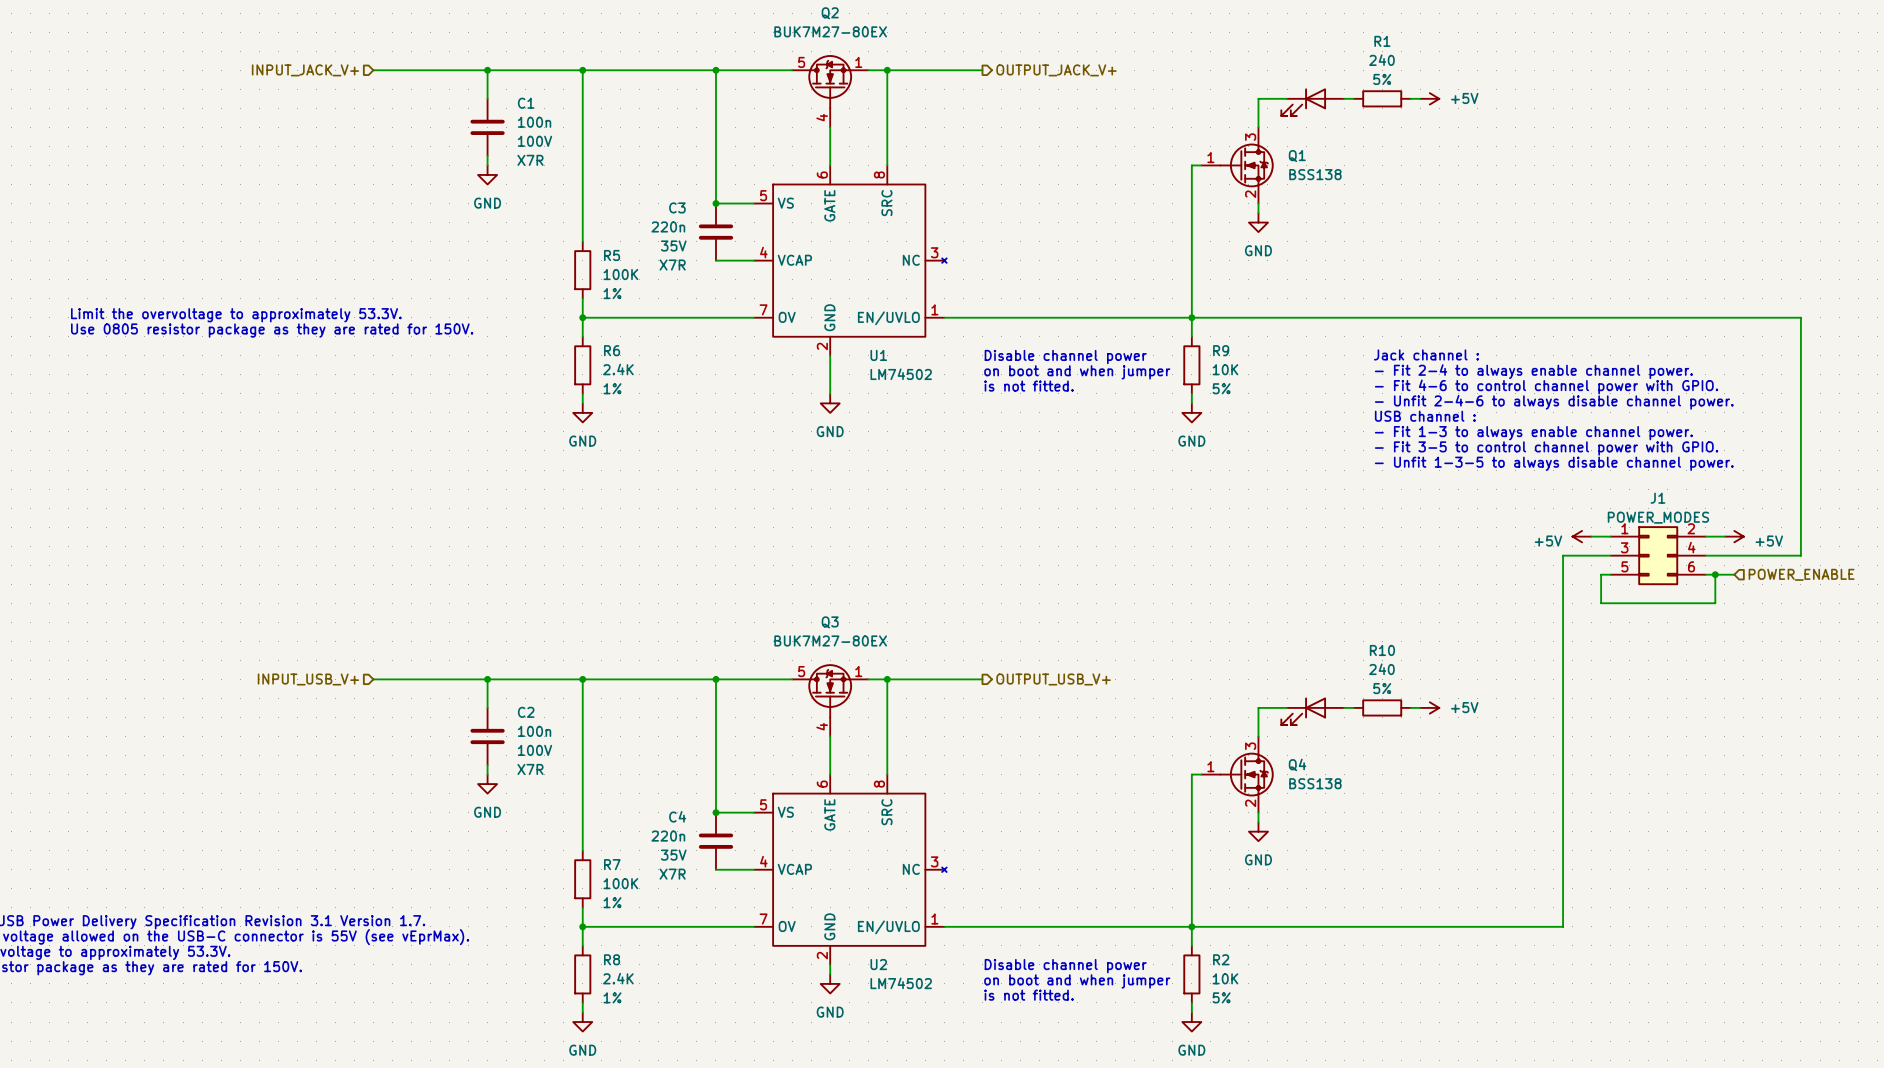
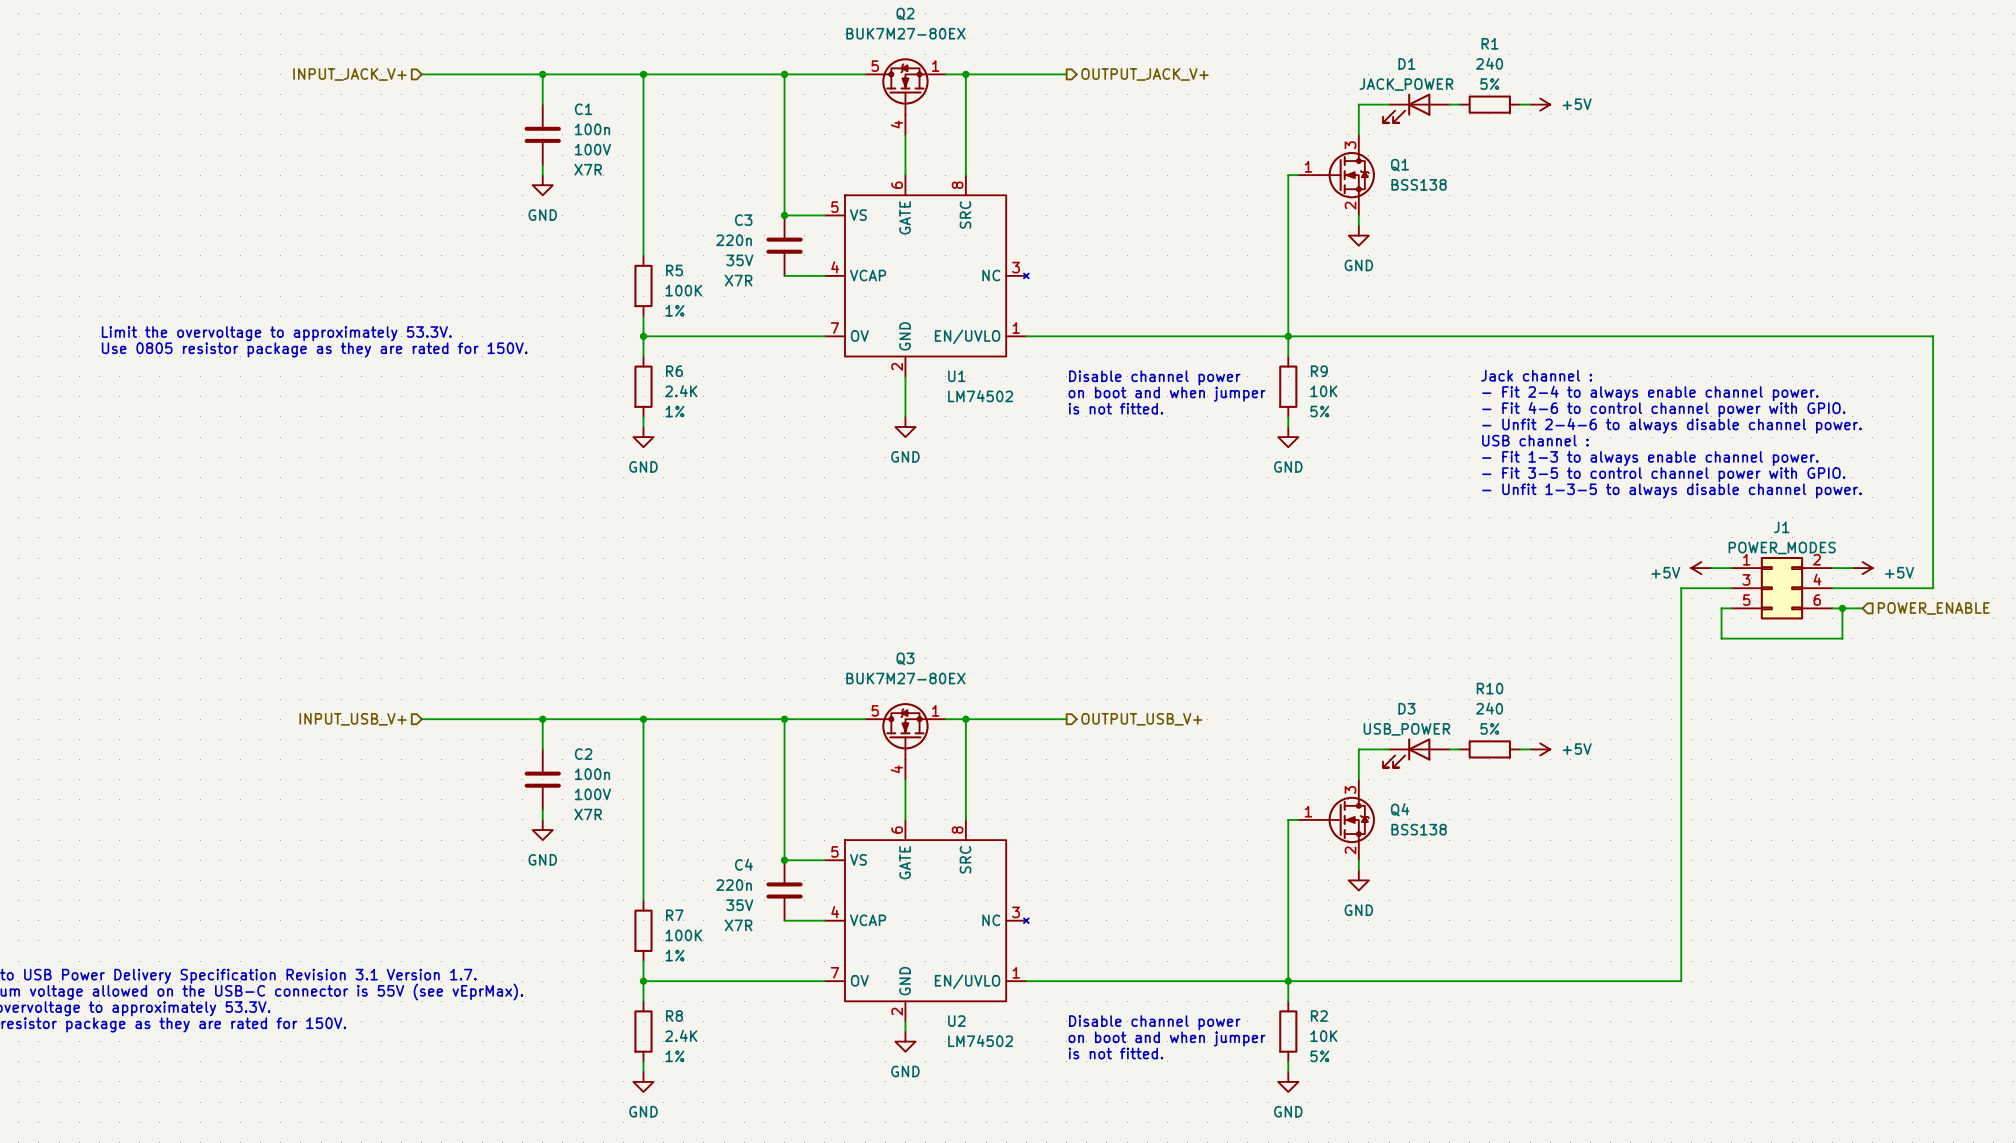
D1 name: none -> D1 (1406, 63)
D1 value: none -> JACK_POWER (1406, 84)
D3 name: none -> D3 (1406, 708)
D3 value: none -> USB_POWER (1406, 729)

